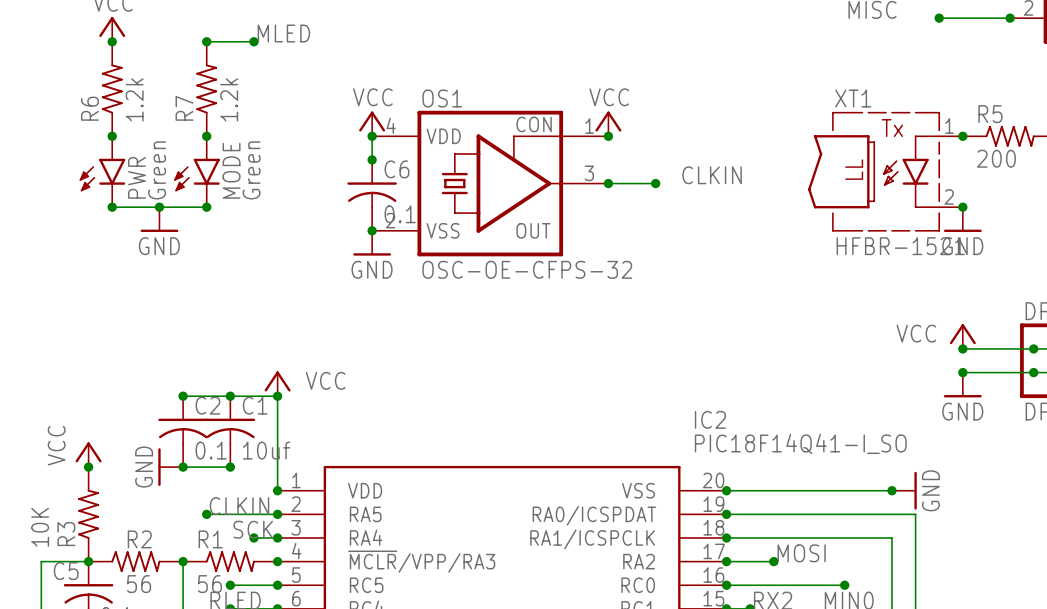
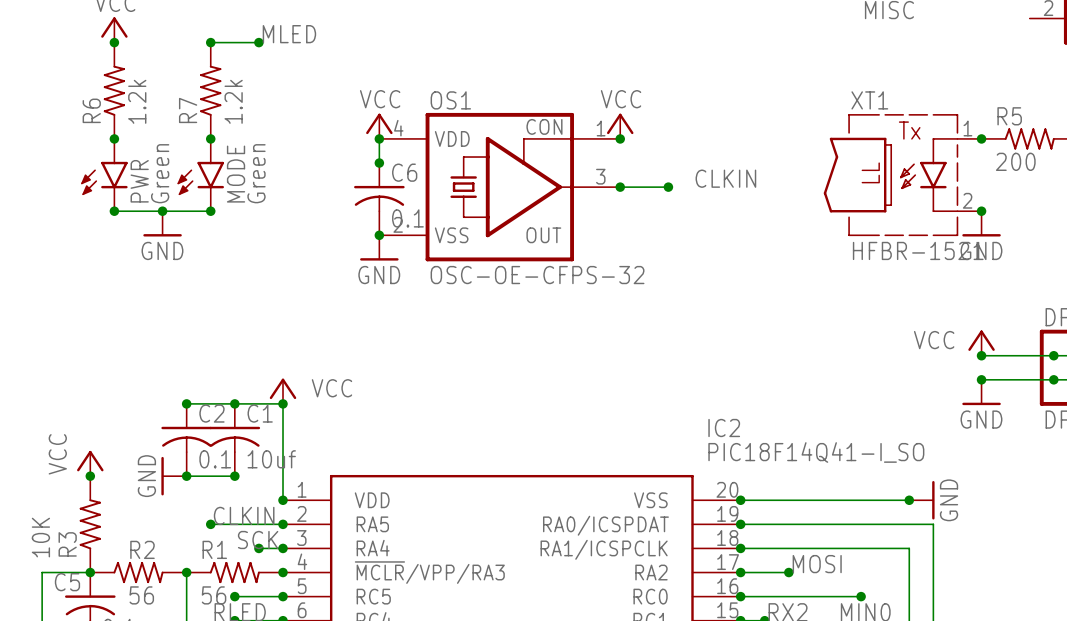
wire: (939, 18) (1010, 18) -> none
junction: (939, 18) -> none
junction: (1010, 18) -> none

